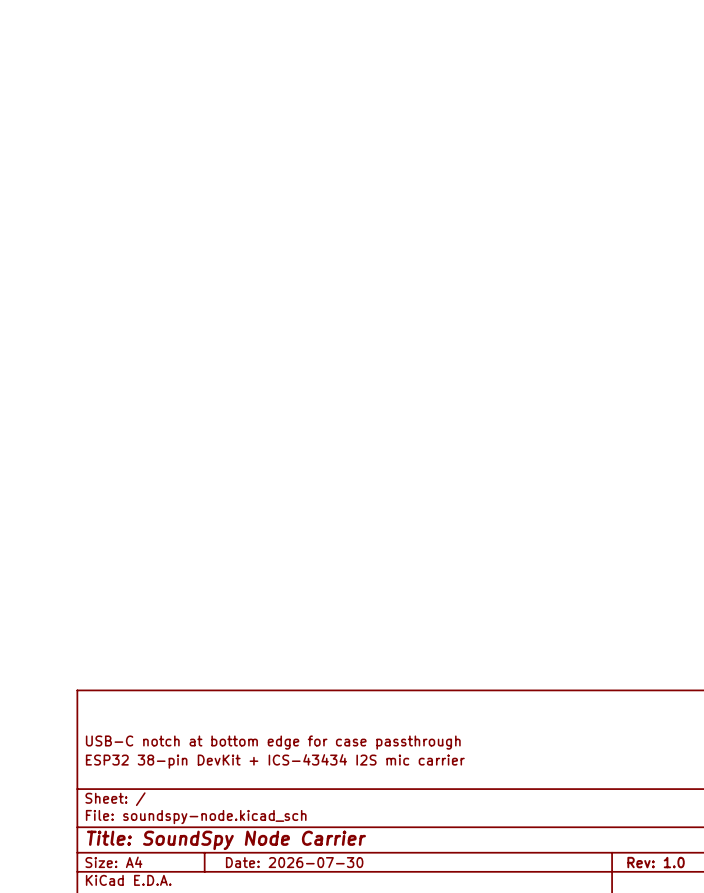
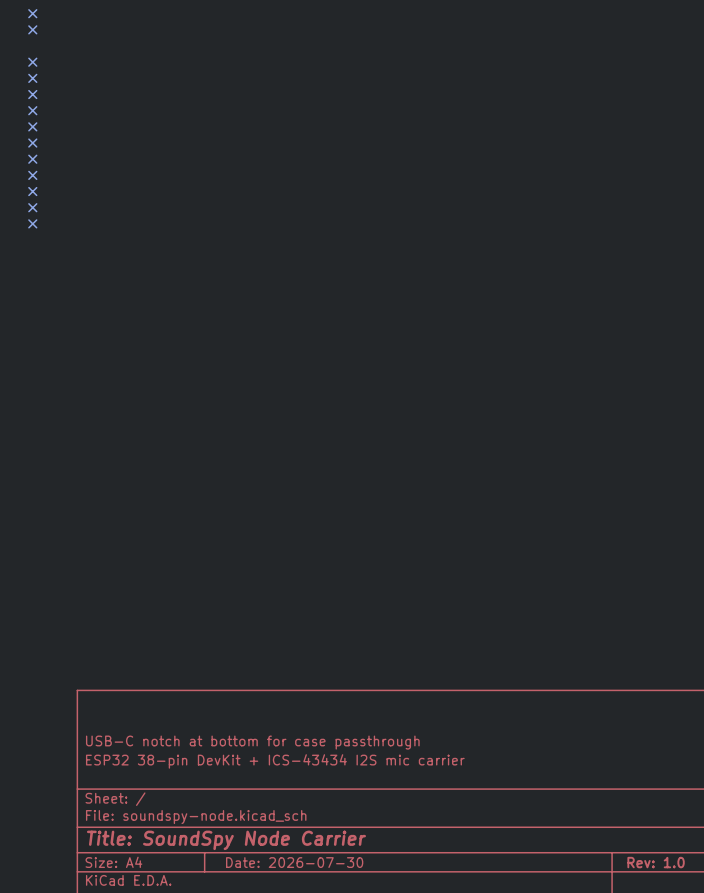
no-connect mark: none -> (32, 13)
no-connect mark: none -> (32, 29)
no-connect mark: none -> (32, 62)
no-connect mark: none -> (32, 78)
no-connect mark: none -> (32, 94)
no-connect mark: none -> (32, 110)
no-connect mark: none -> (32, 126)
no-connect mark: none -> (32, 143)
no-connect mark: none -> (32, 159)
no-connect mark: none -> (32, 175)
no-connect mark: none -> (32, 191)
no-connect mark: none -> (32, 207)
no-connect mark: none -> (32, 223)
title block: USB-C notch at bottom edge for case passthrough (273, 742) -> USB-C notch at bottom for case passthrough (252, 742)

